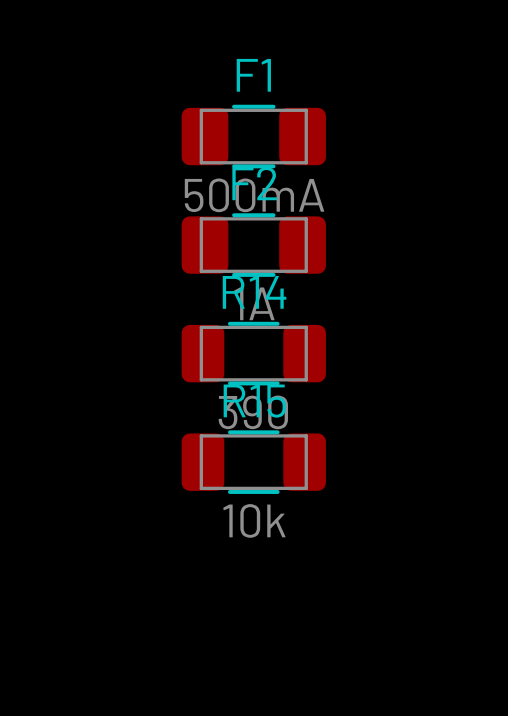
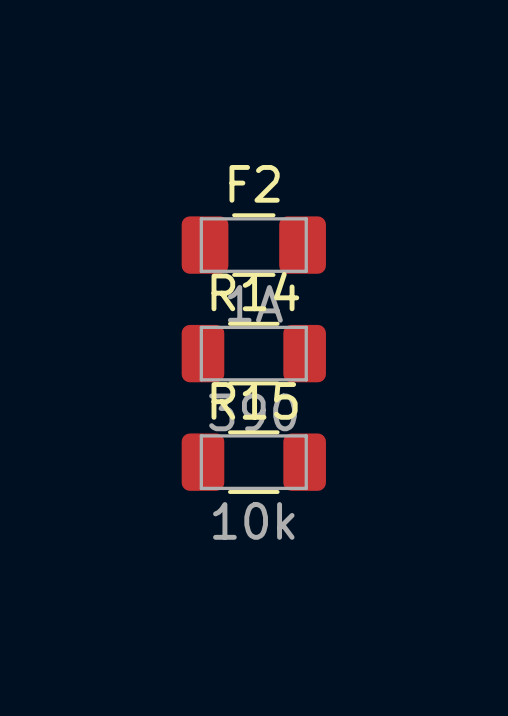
F1: 500mA (253, 136) -> none

